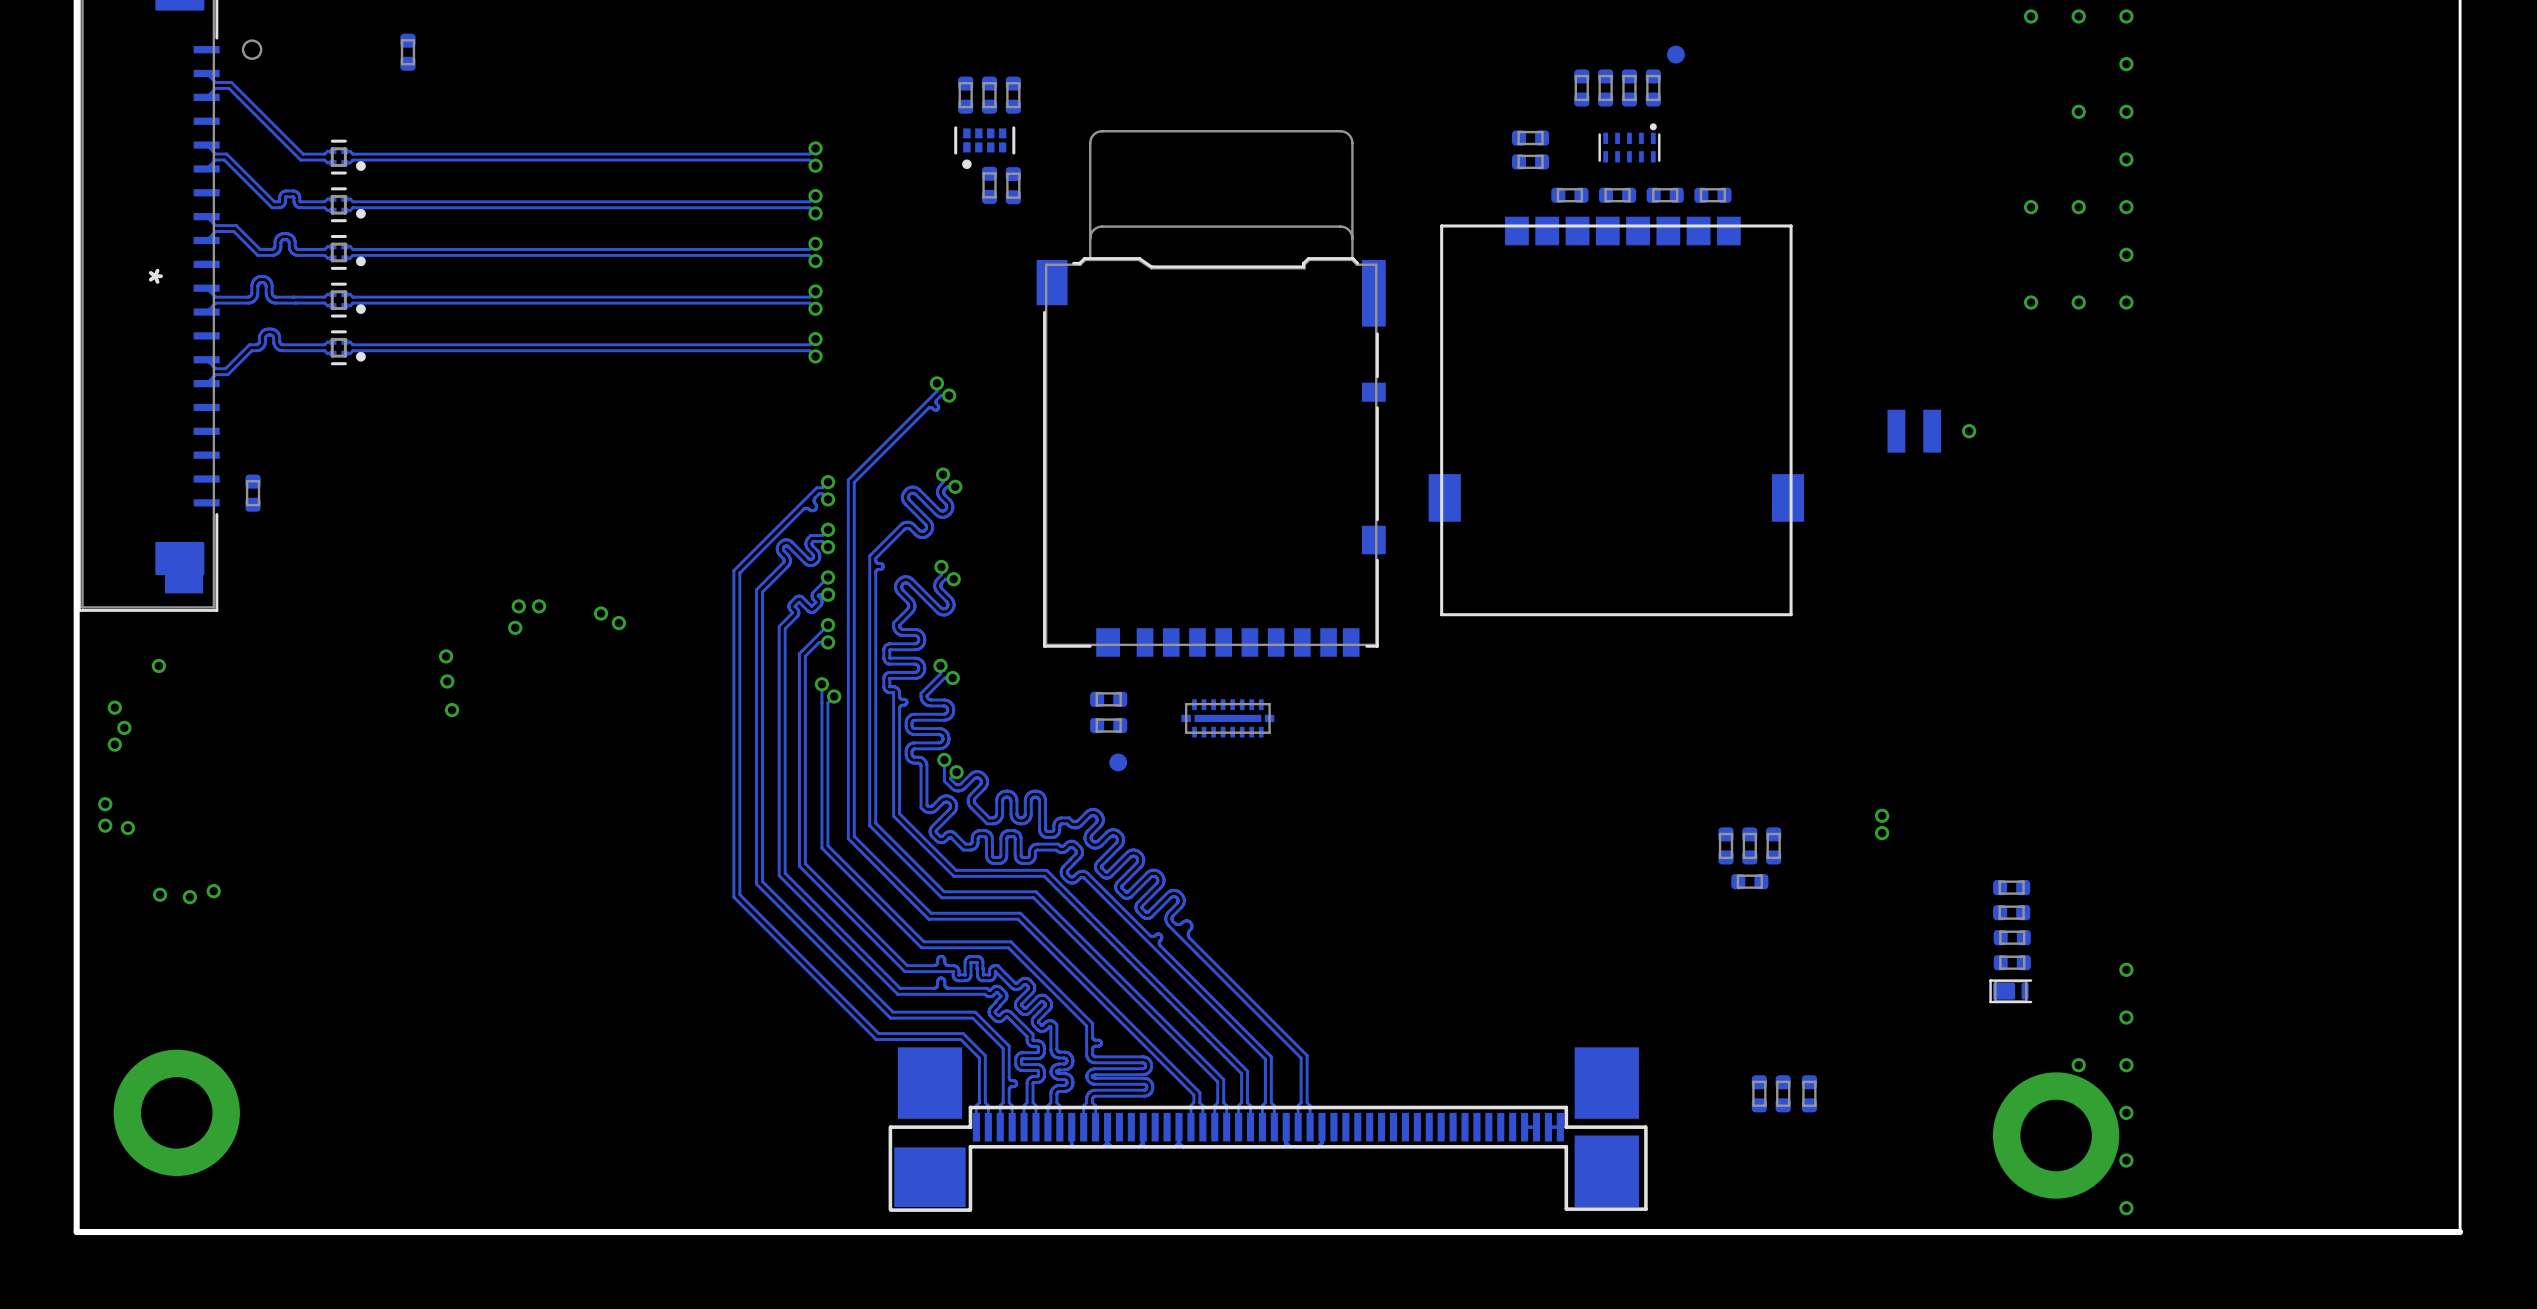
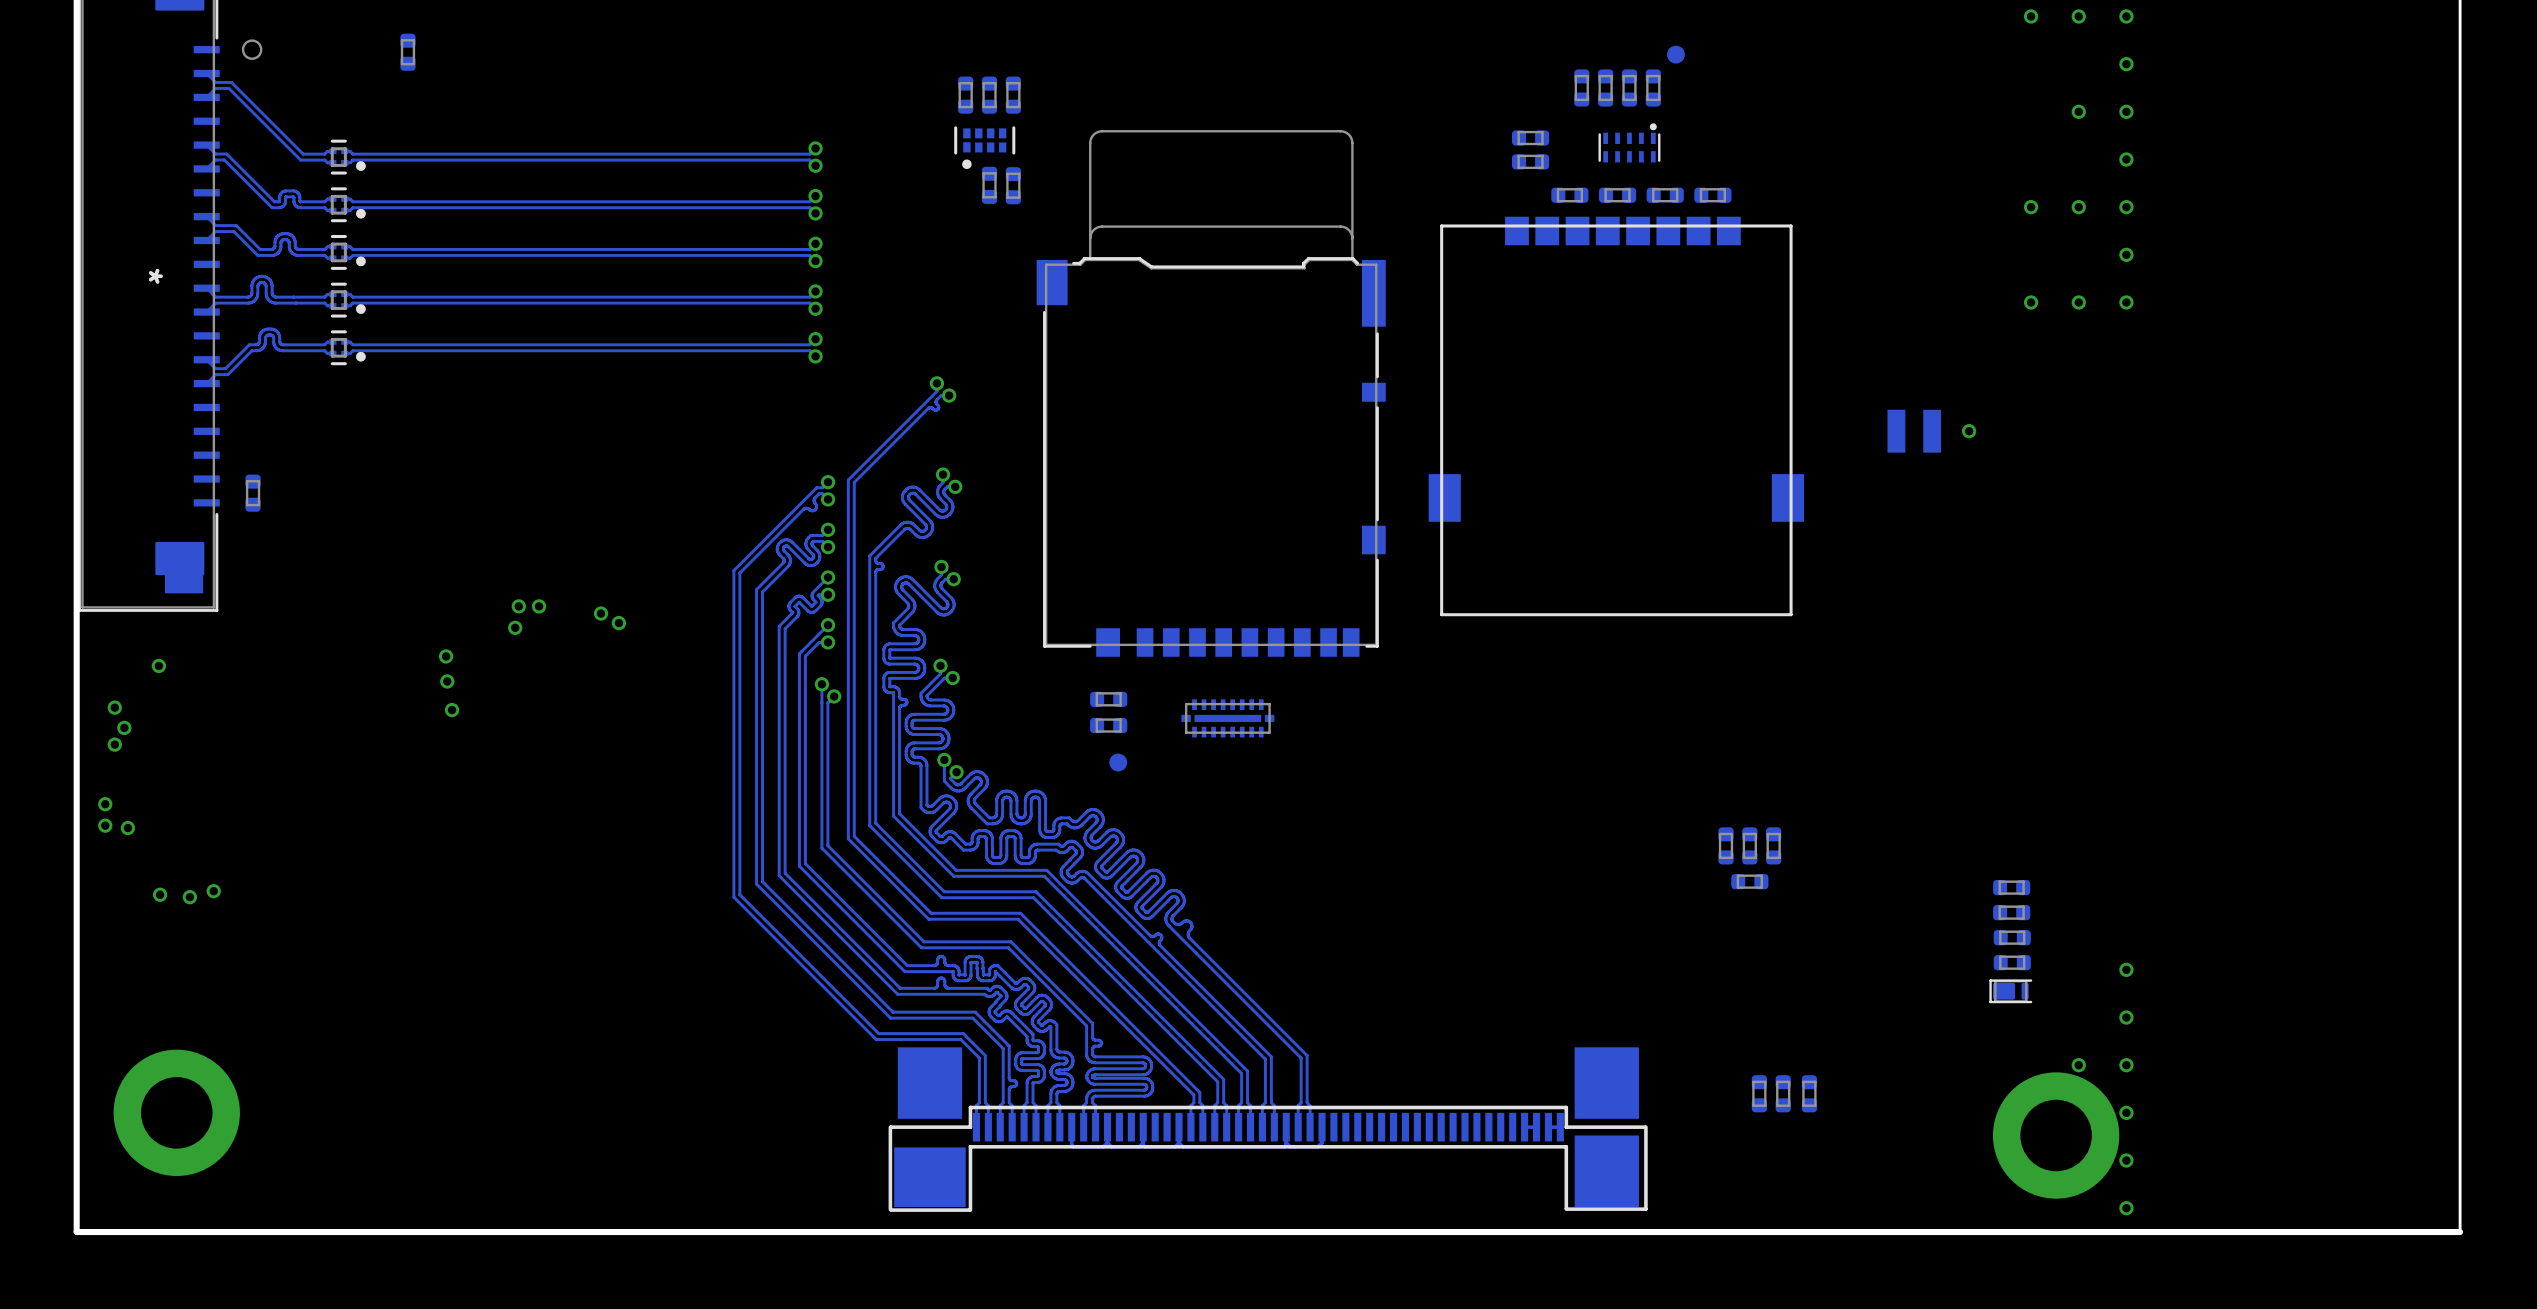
via: (1882, 815) -> none
via: (1882, 833) -> none

